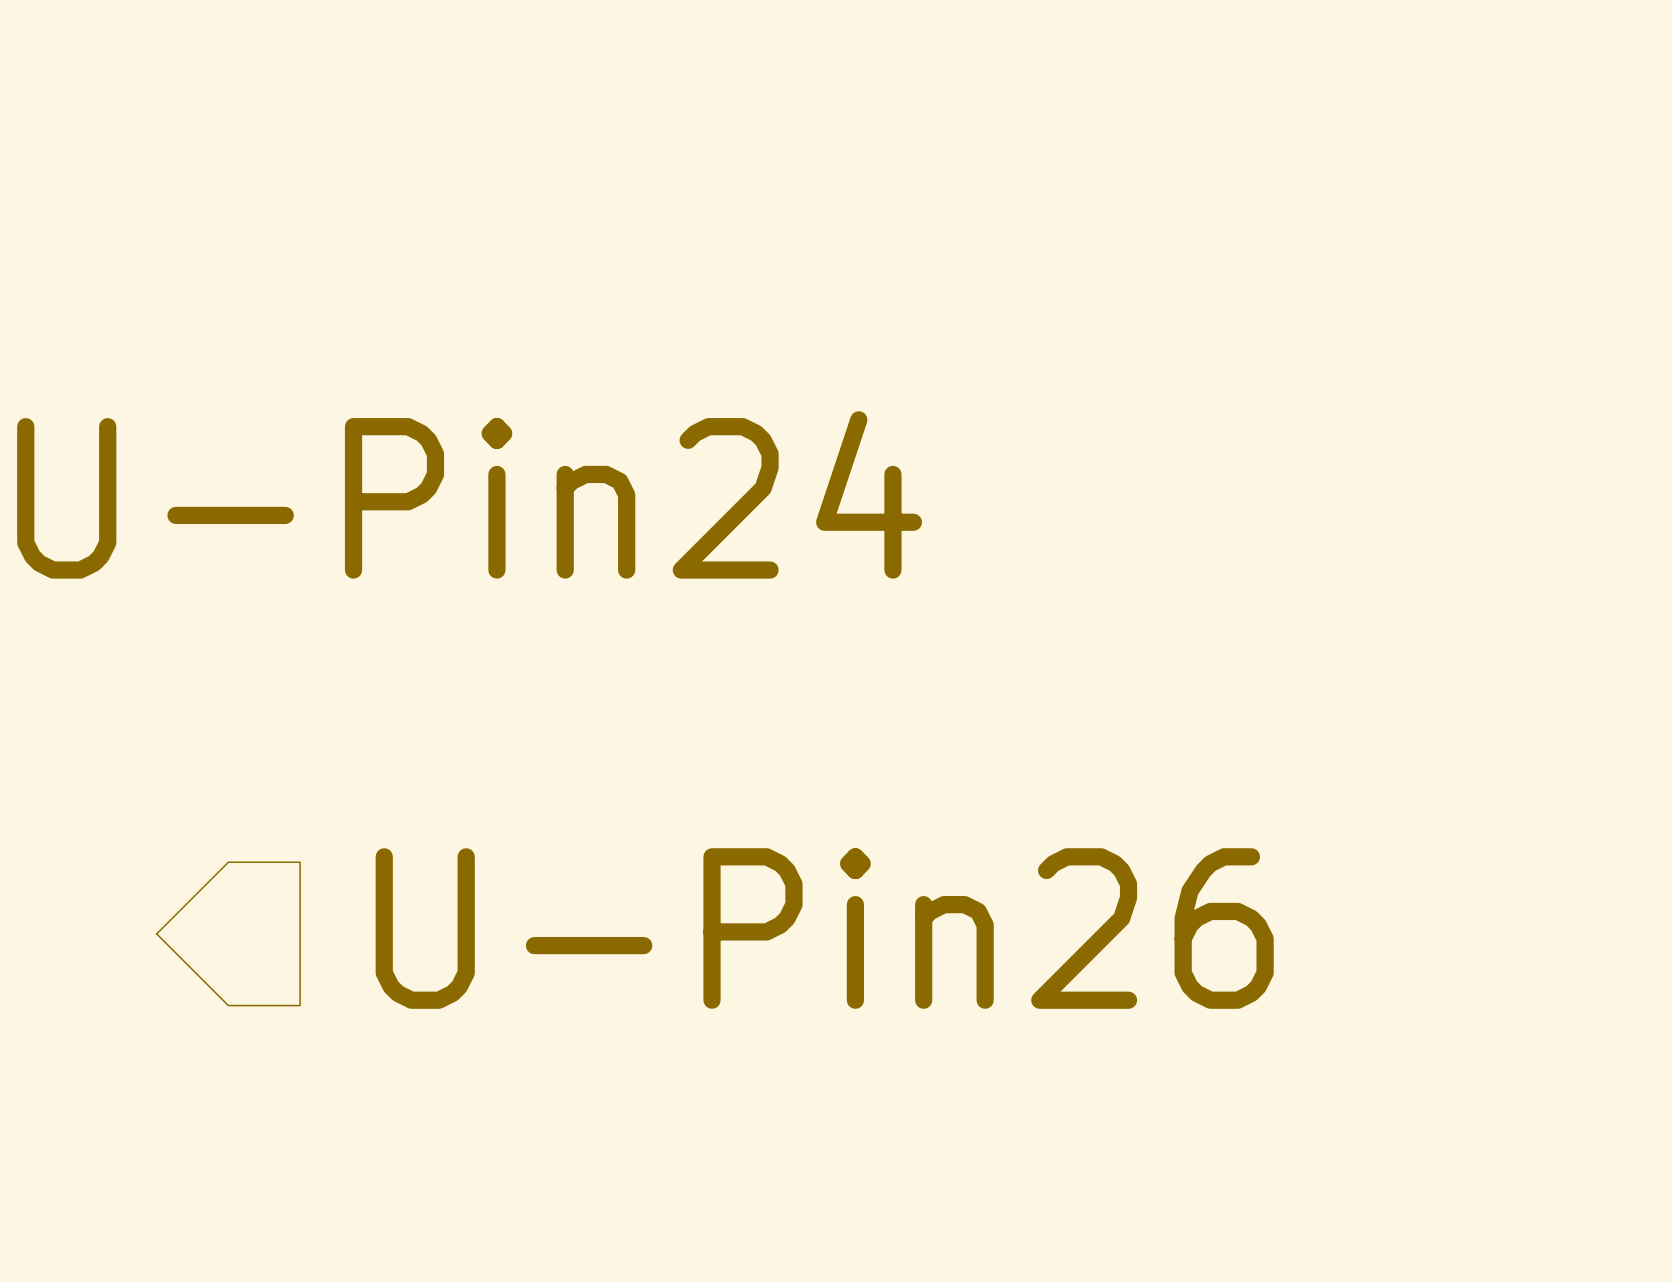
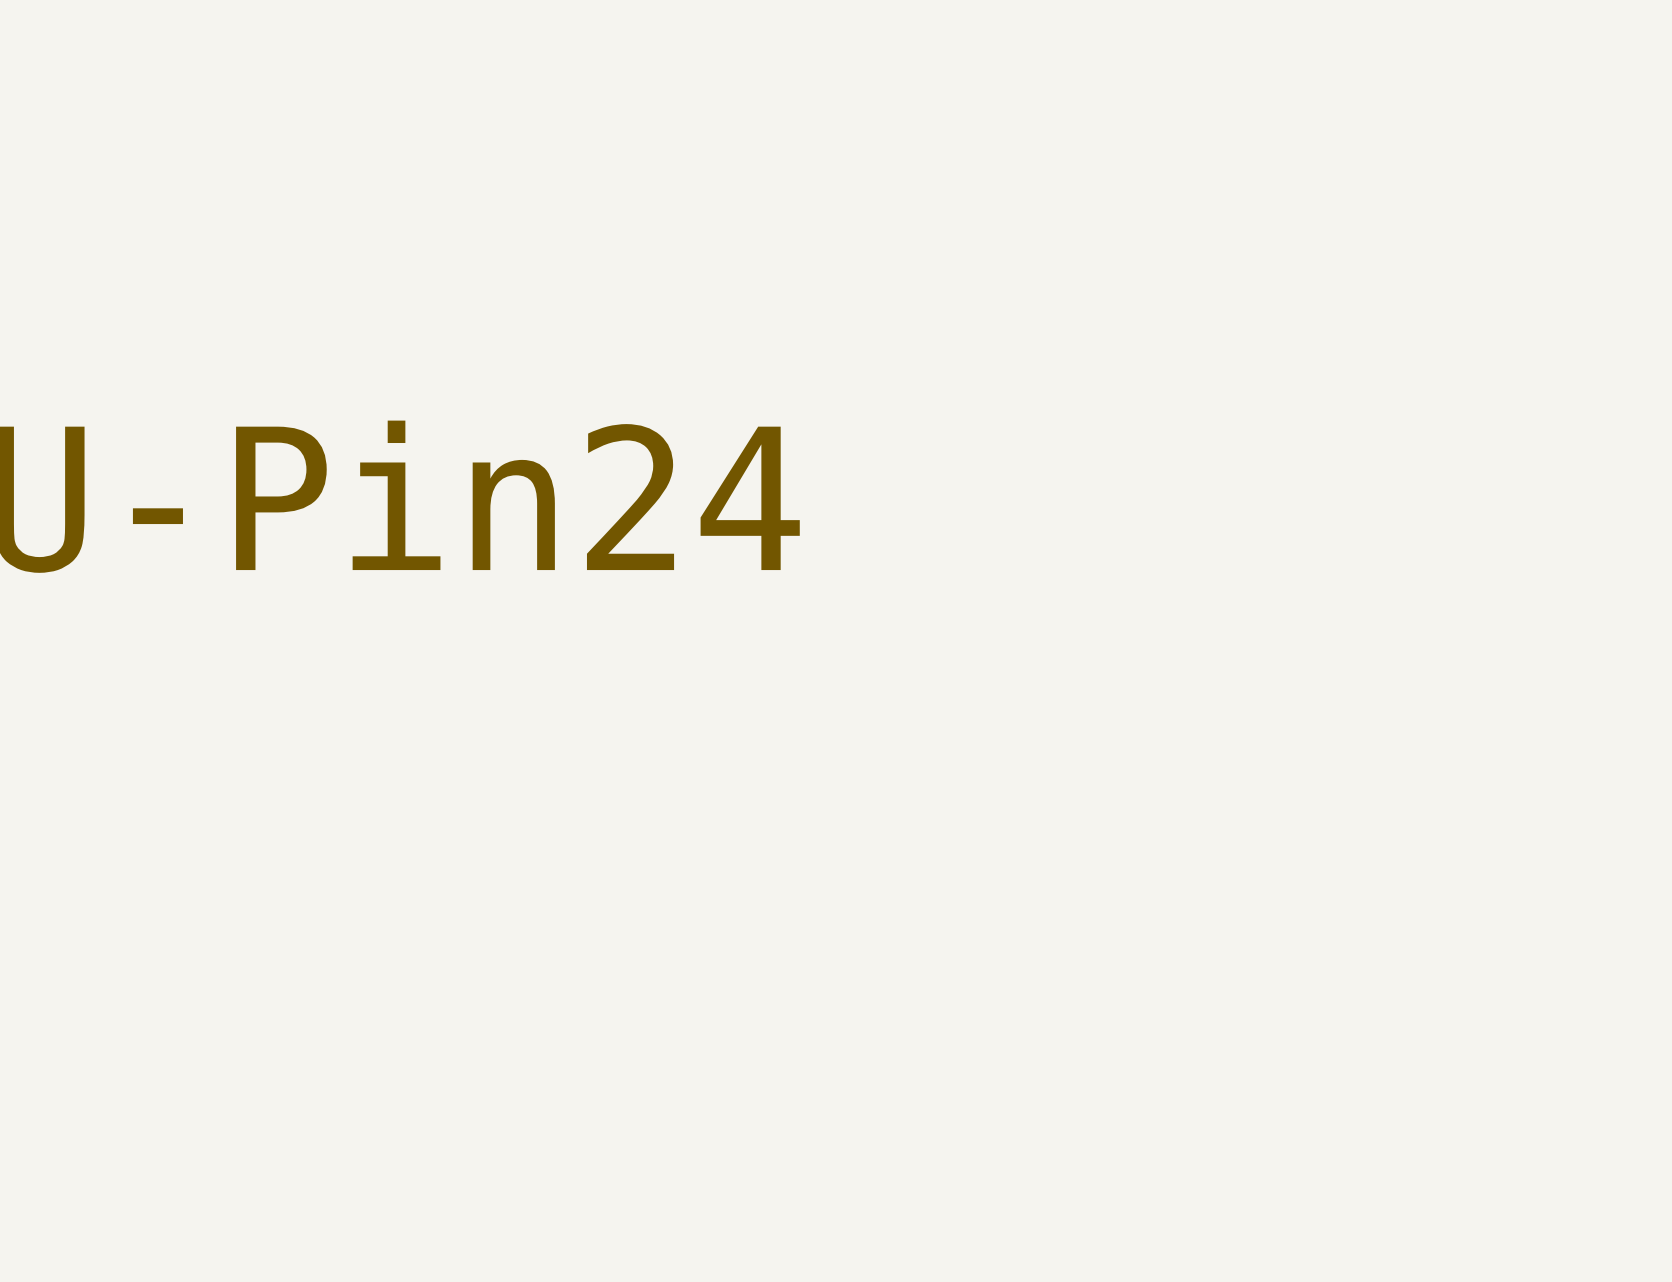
hierarchical label: U-Pin26 (824, 928) -> none

